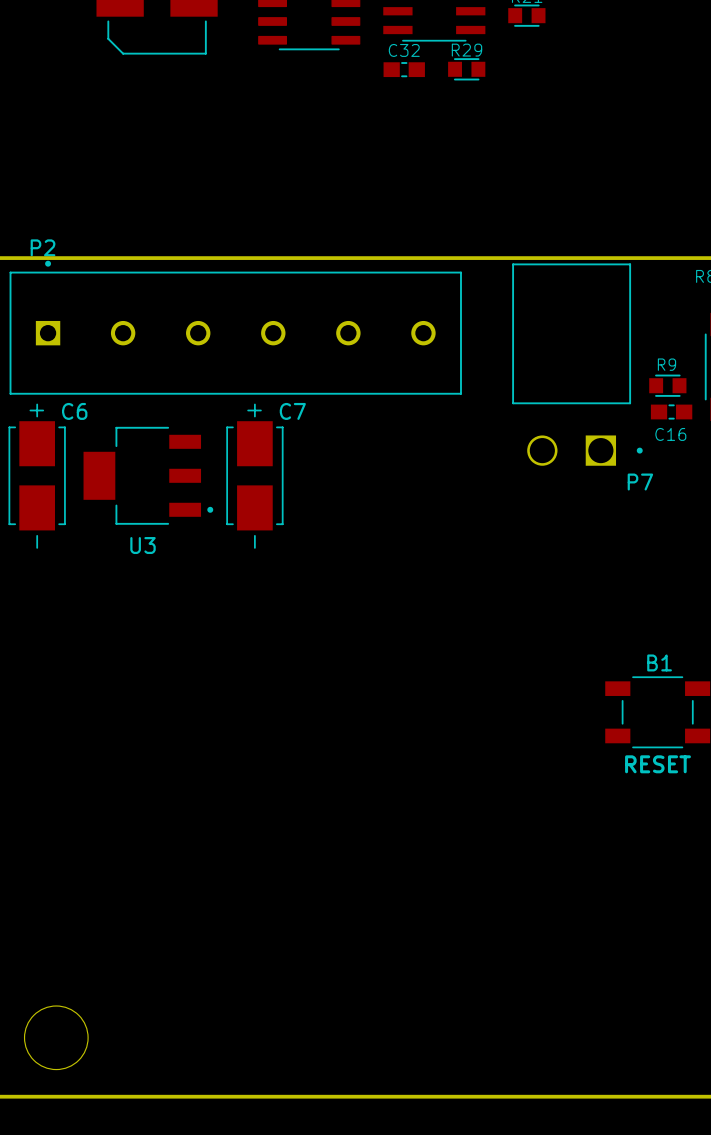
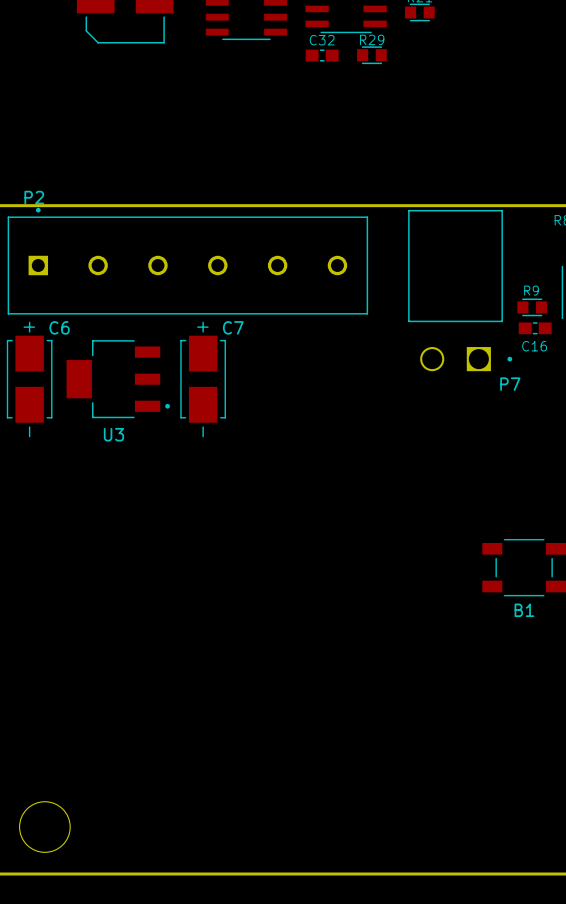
B1 name position: B1 (659, 662) -> B1 (524, 610)
text: RESET (658, 764) -> none

